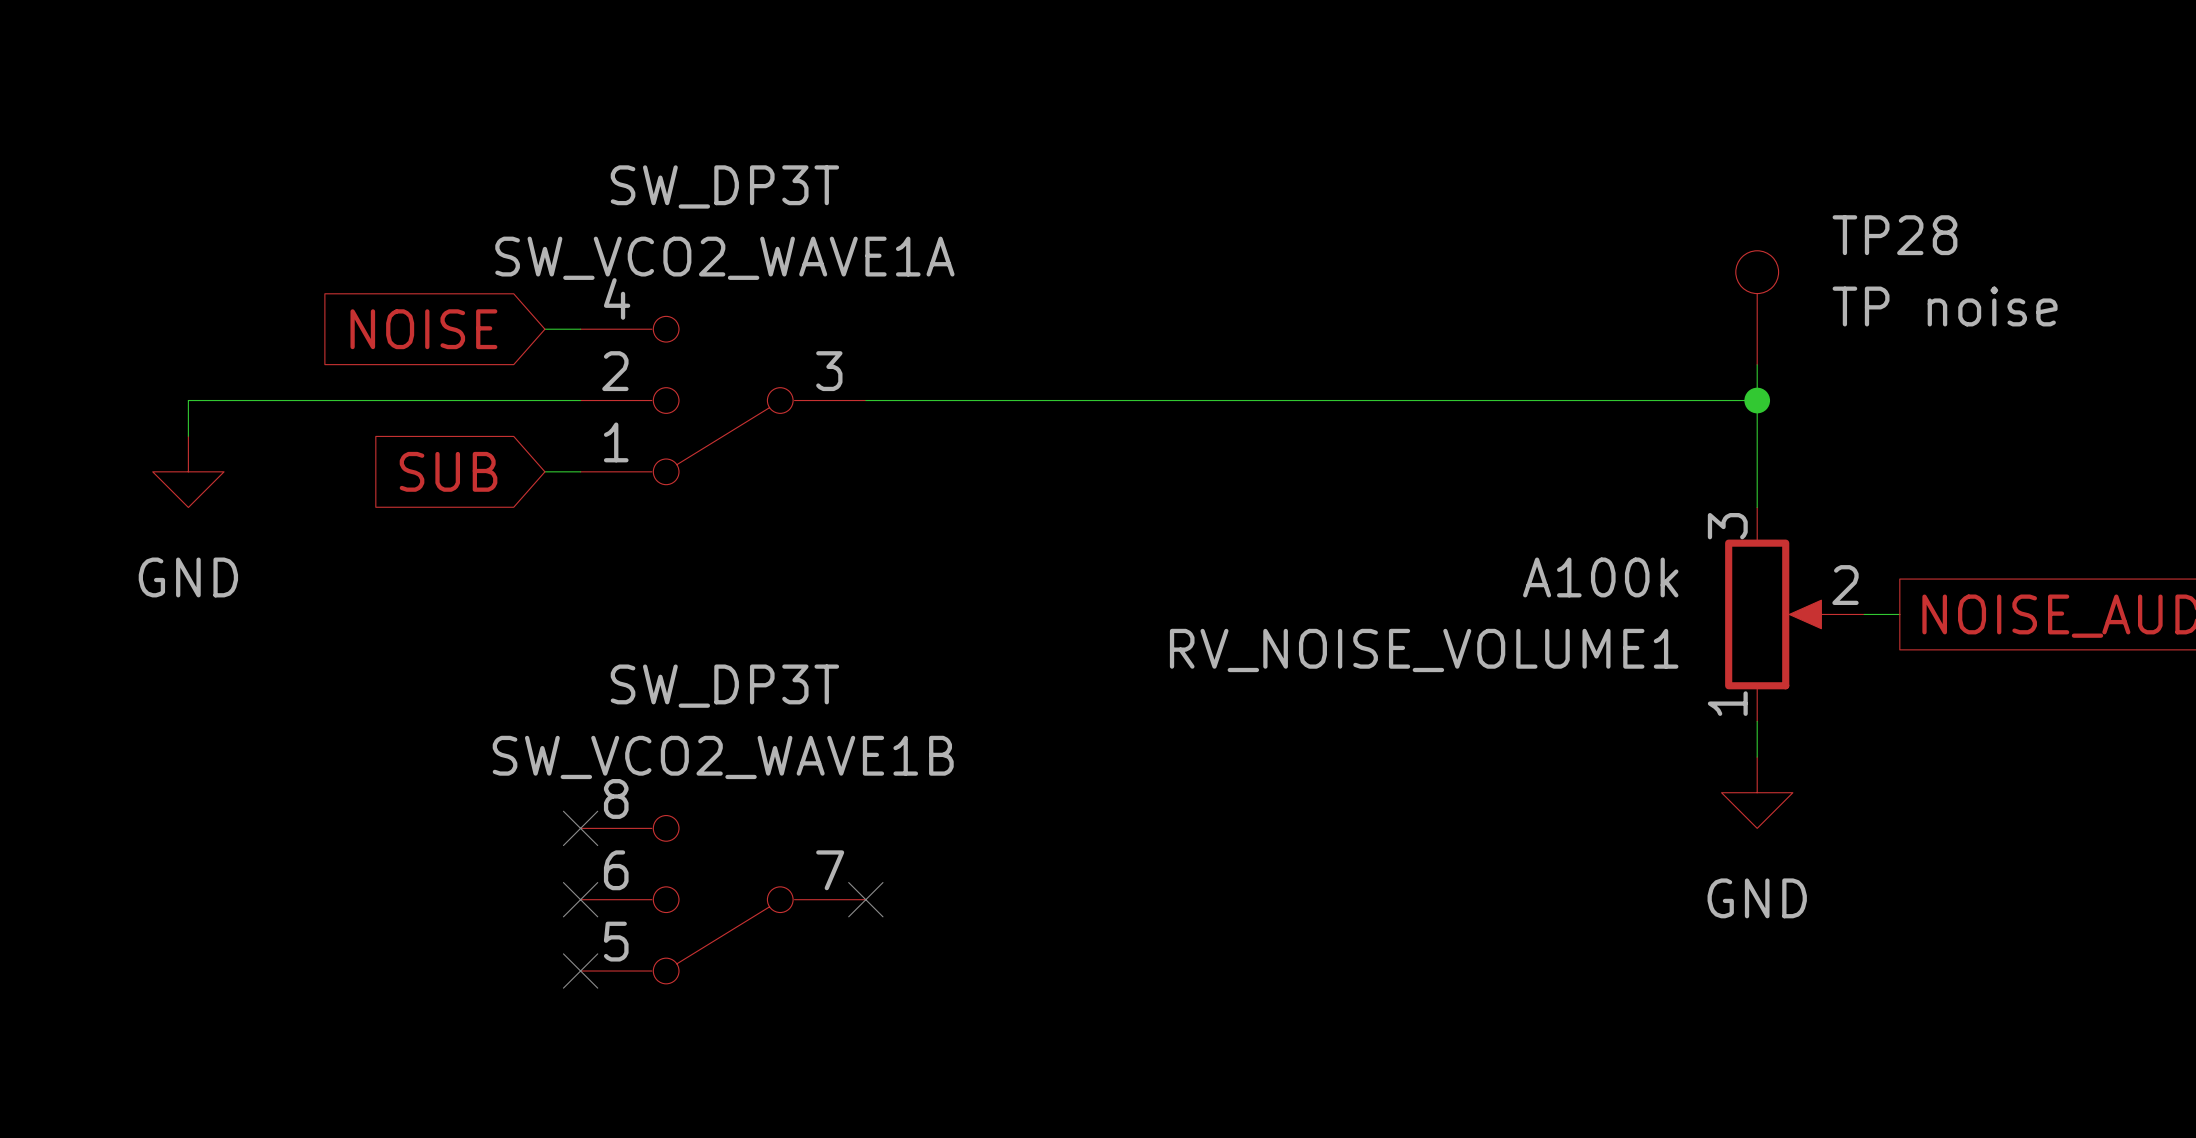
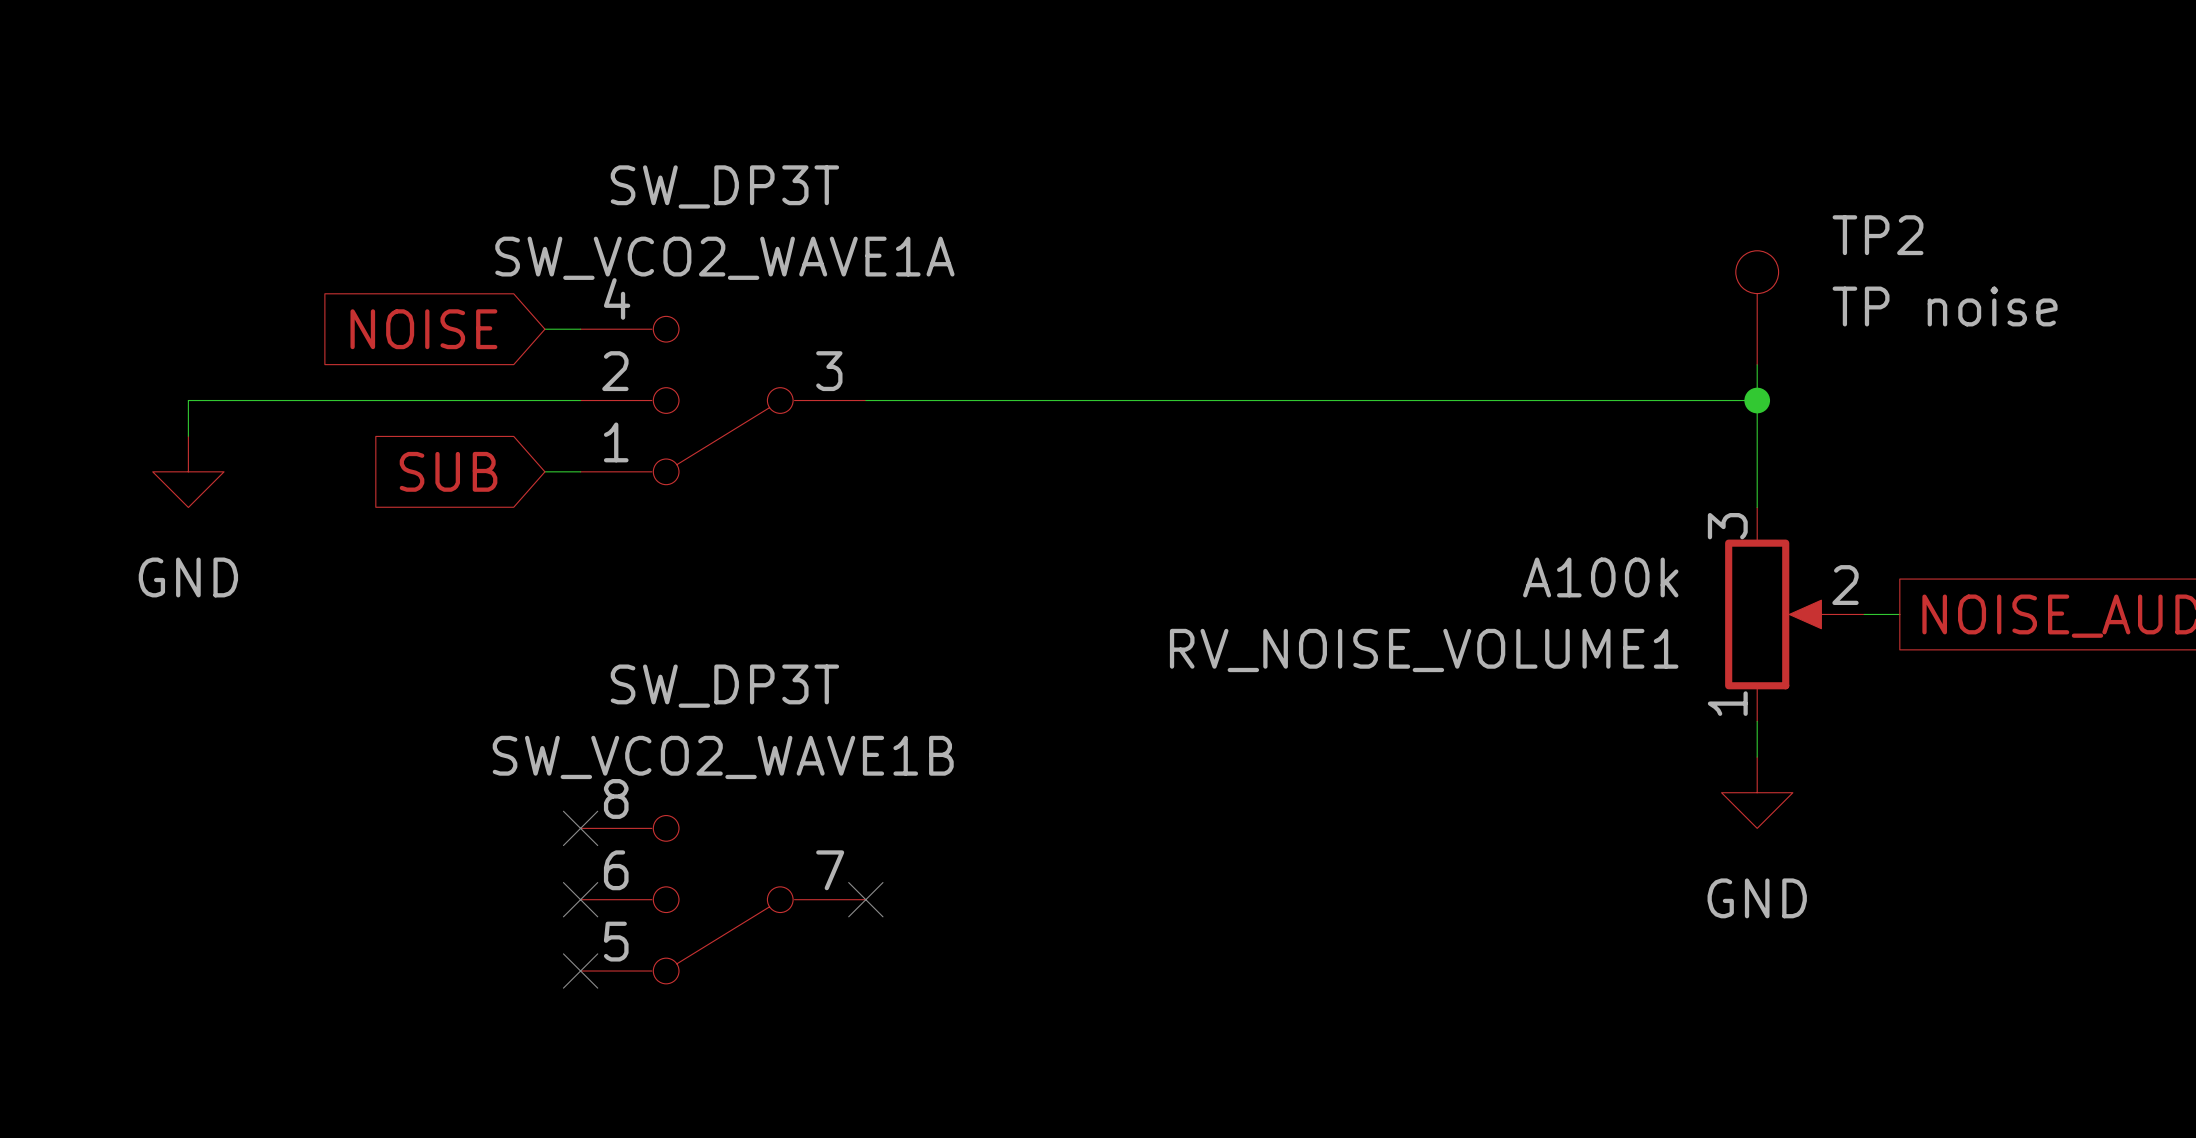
TP28 name: TP28 (1895, 235) -> TP2 (1878, 235)

